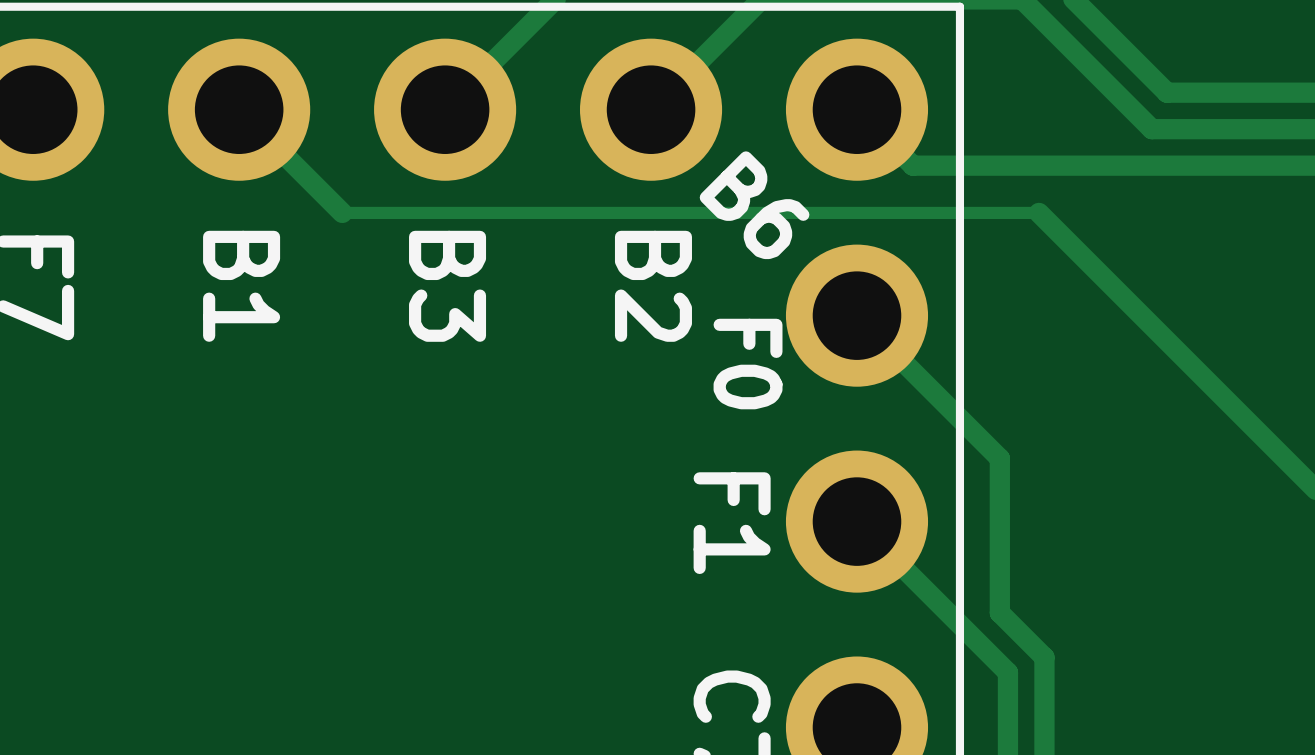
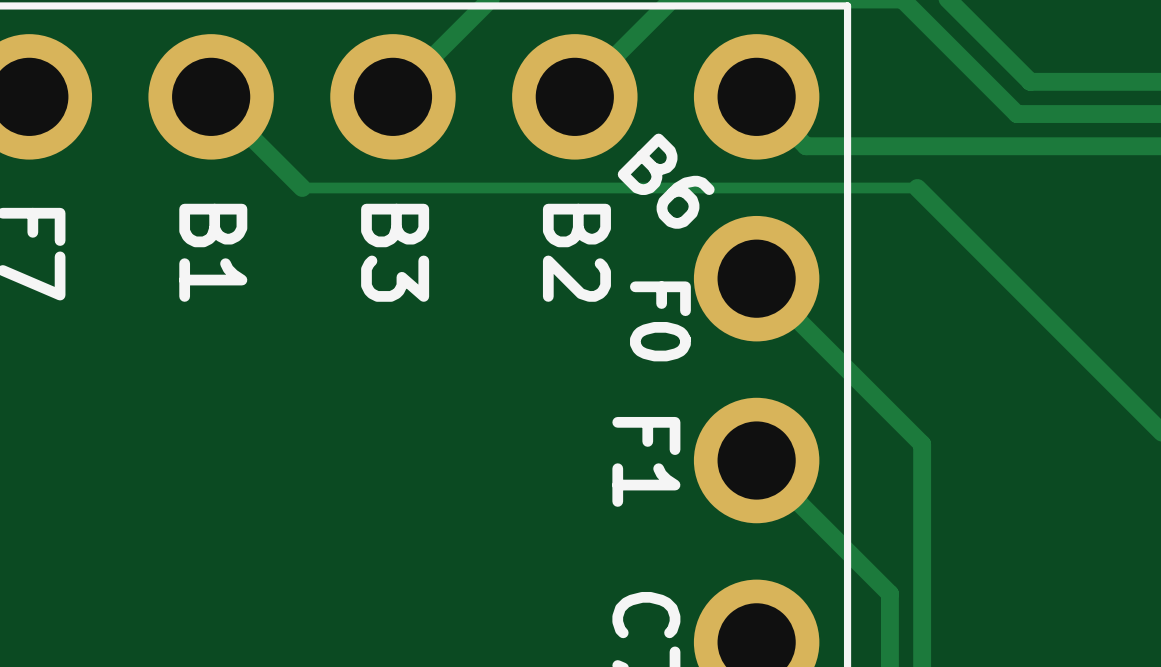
track: (999, 458) (999, 612) (1044, 657) -> (882, 404) (922, 444) (922, 580)

